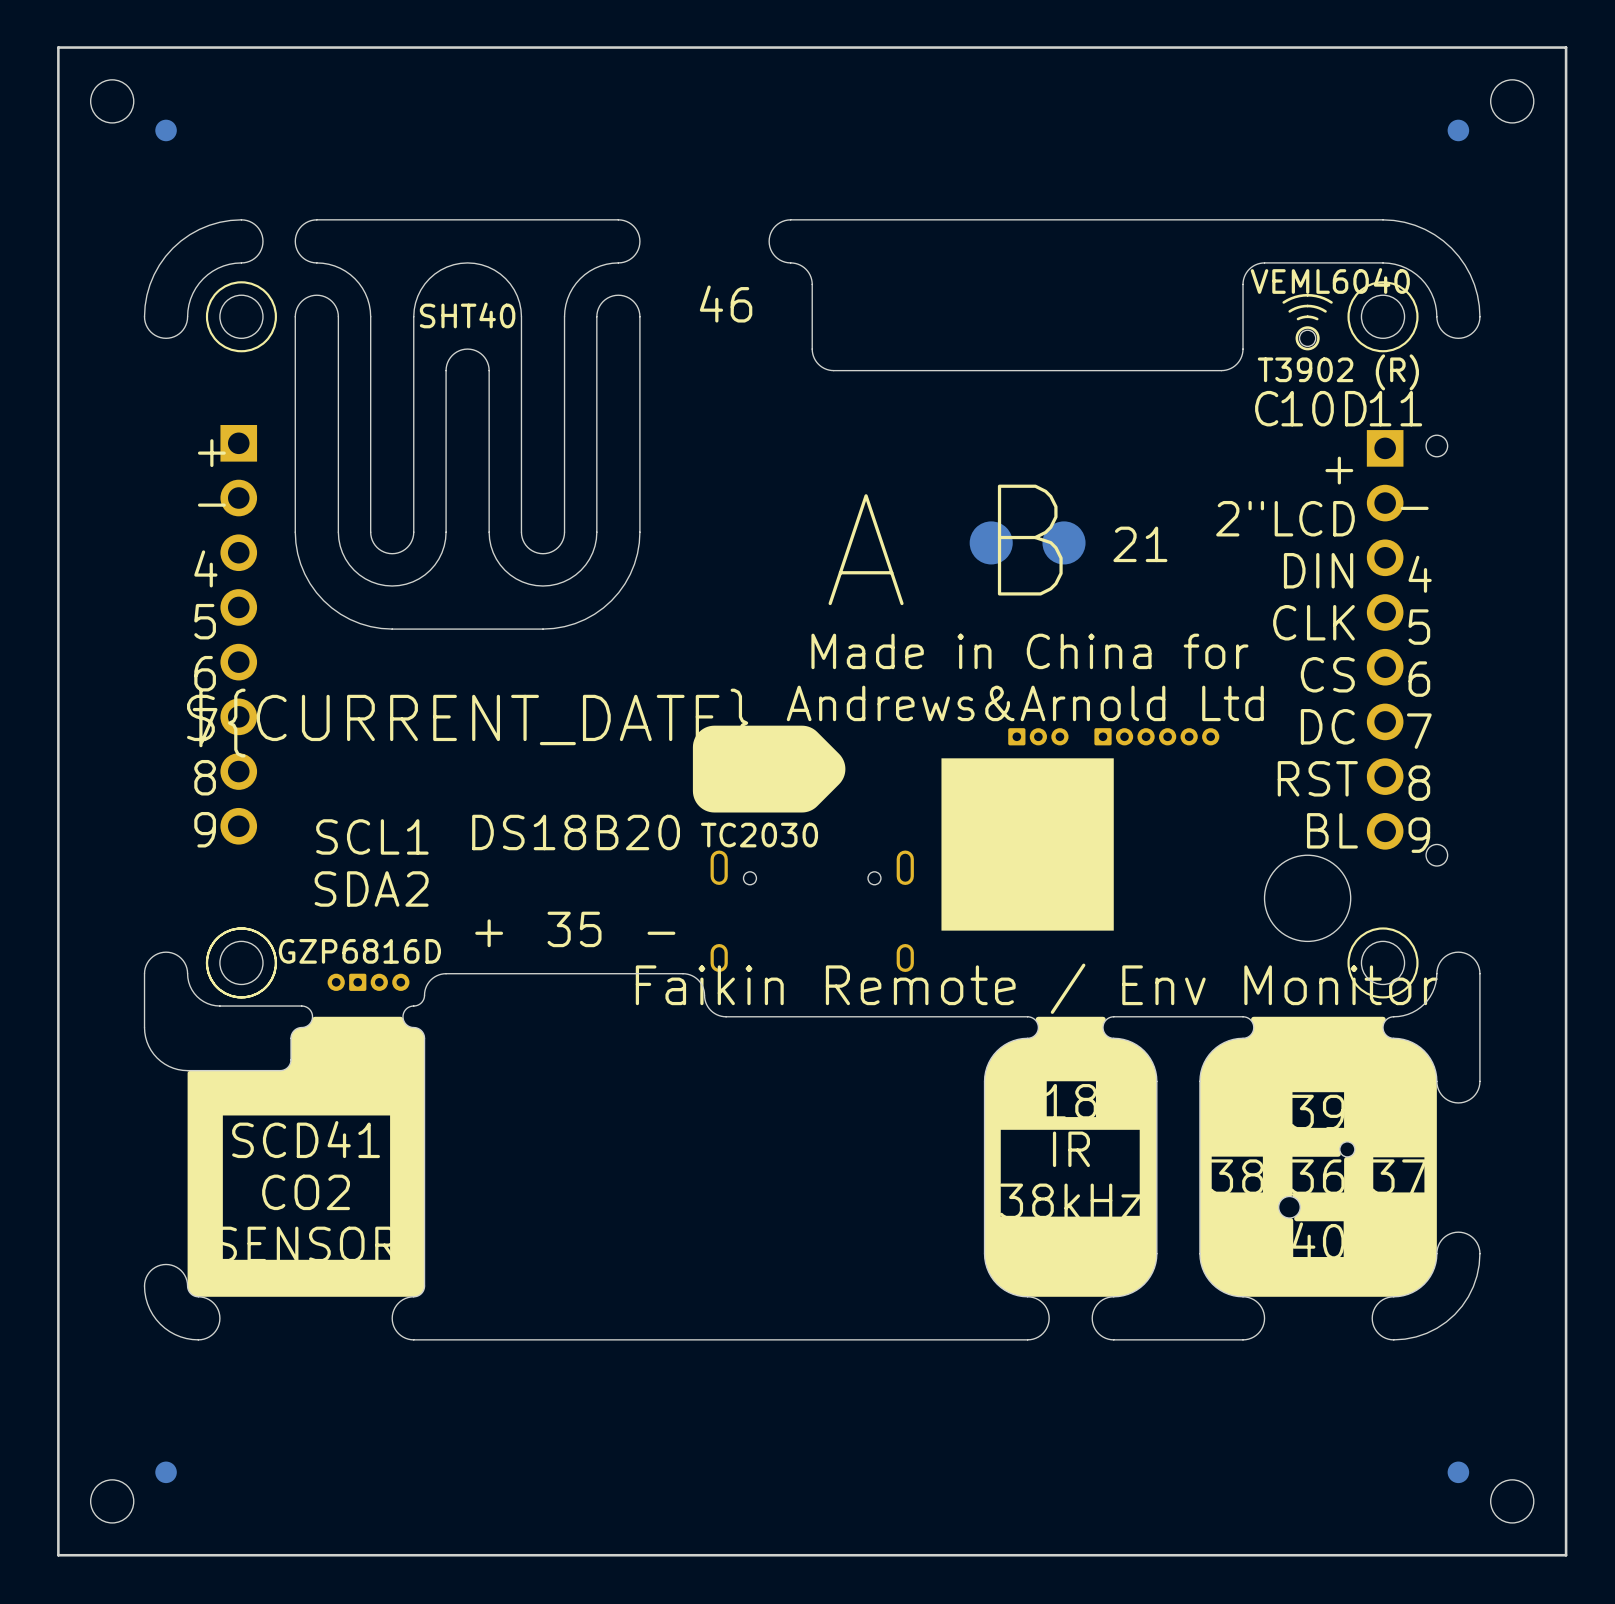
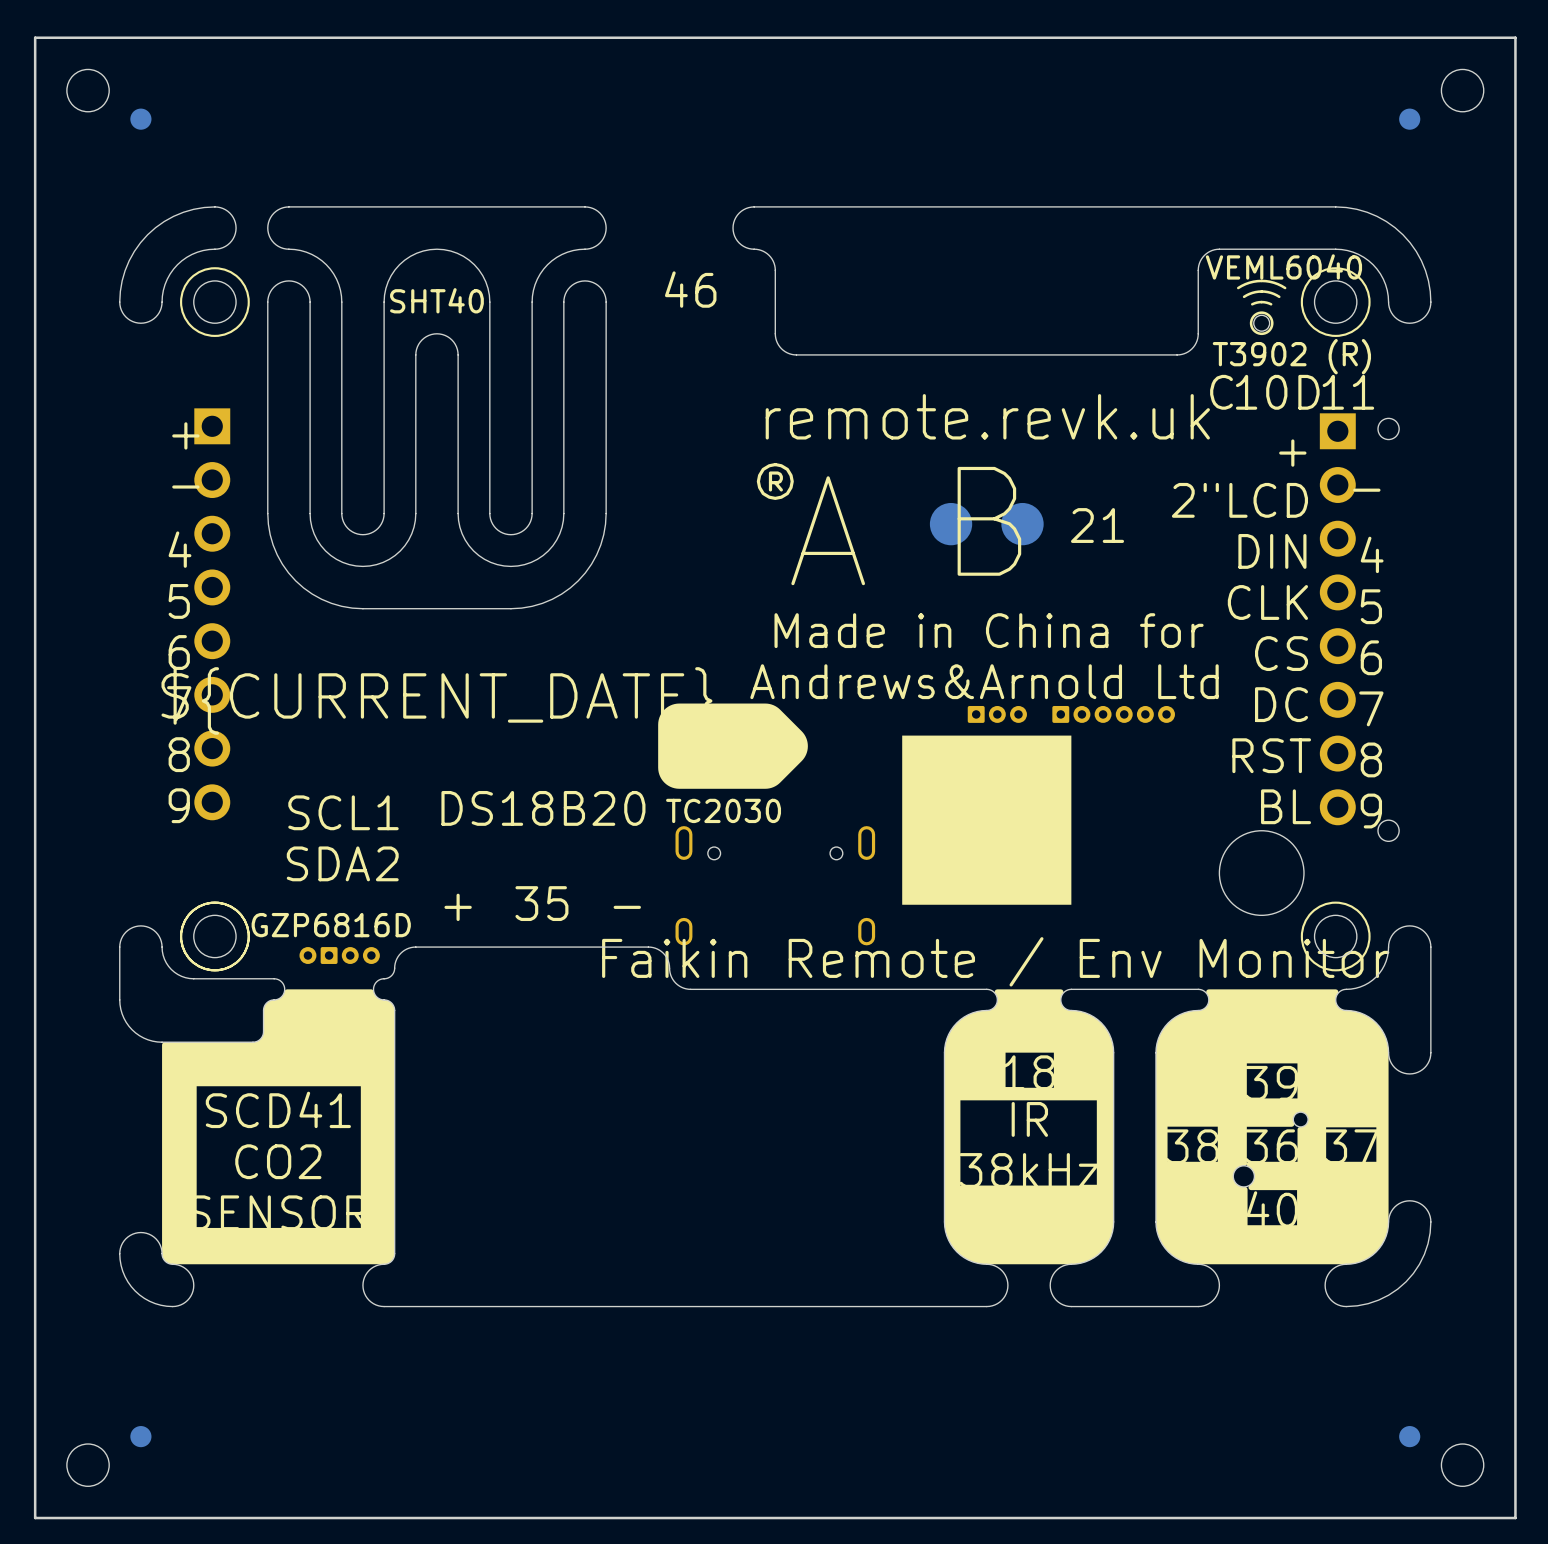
text: none -> remote.revk.uk (987, 416)
text: none -> ® (775, 481)

